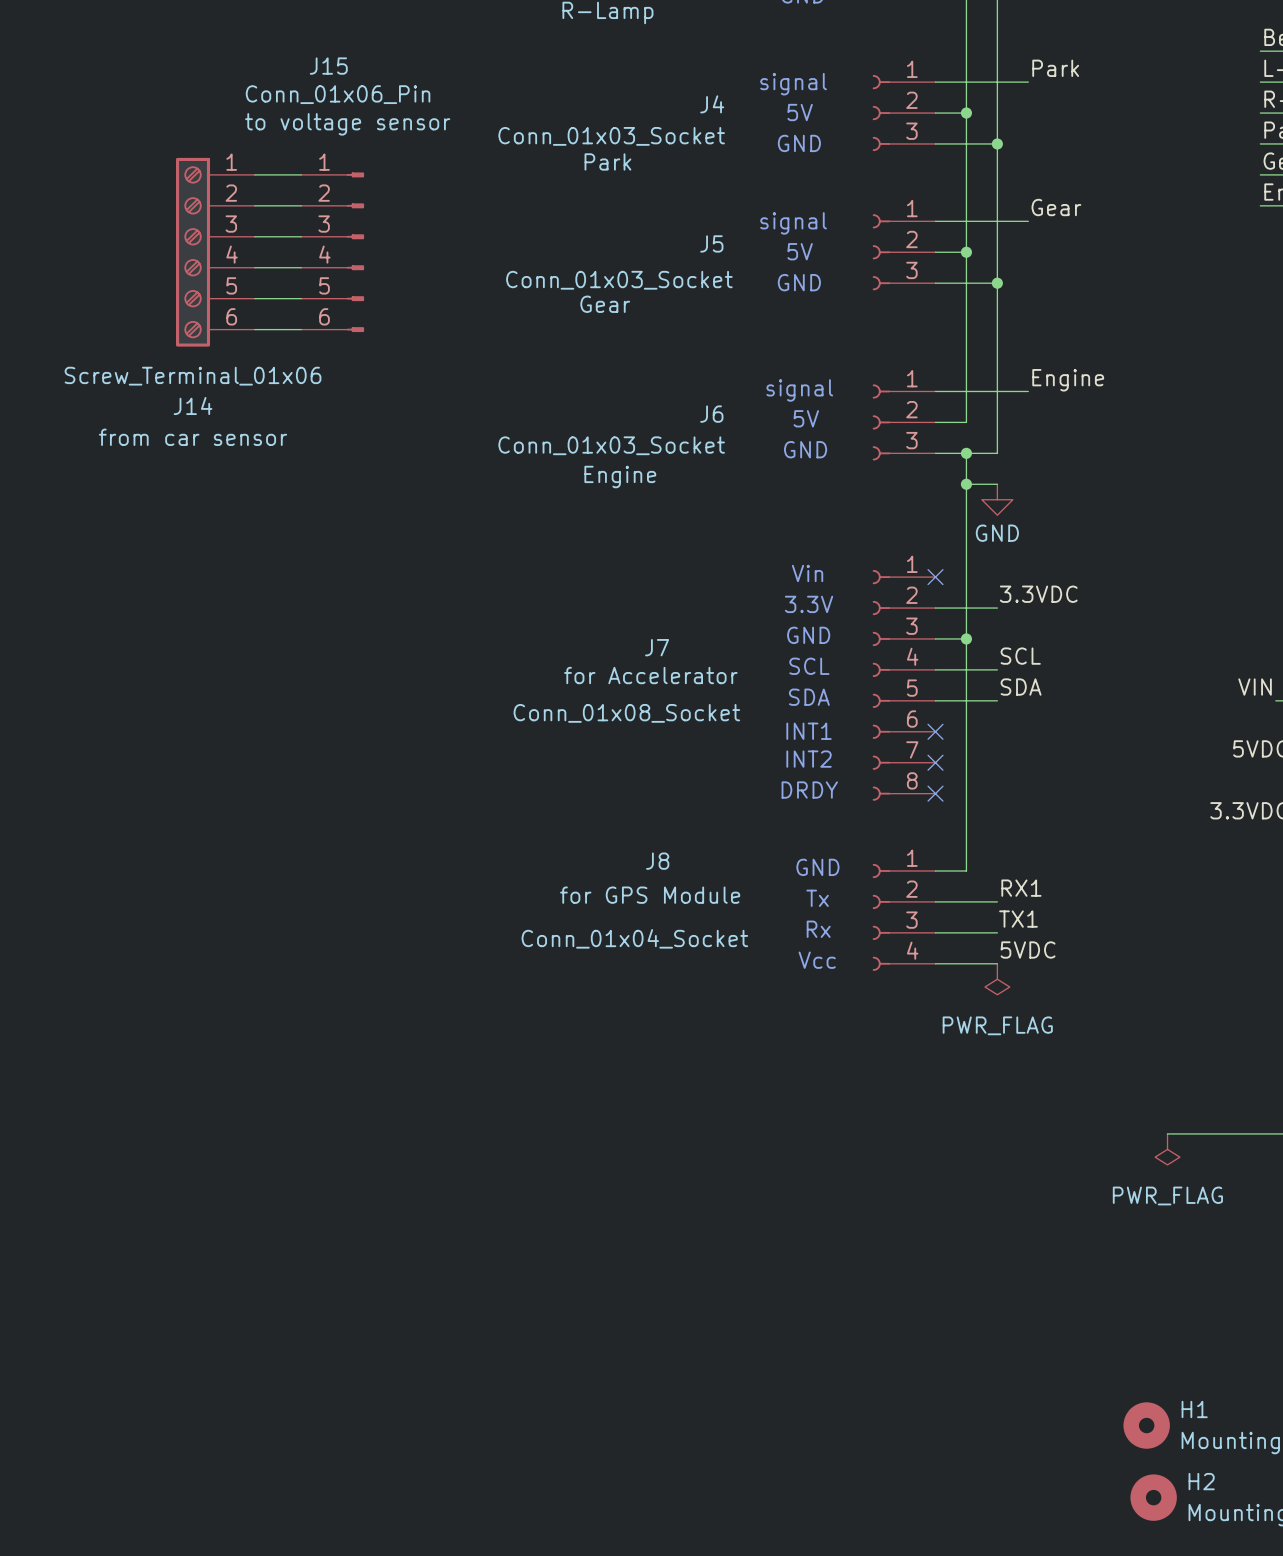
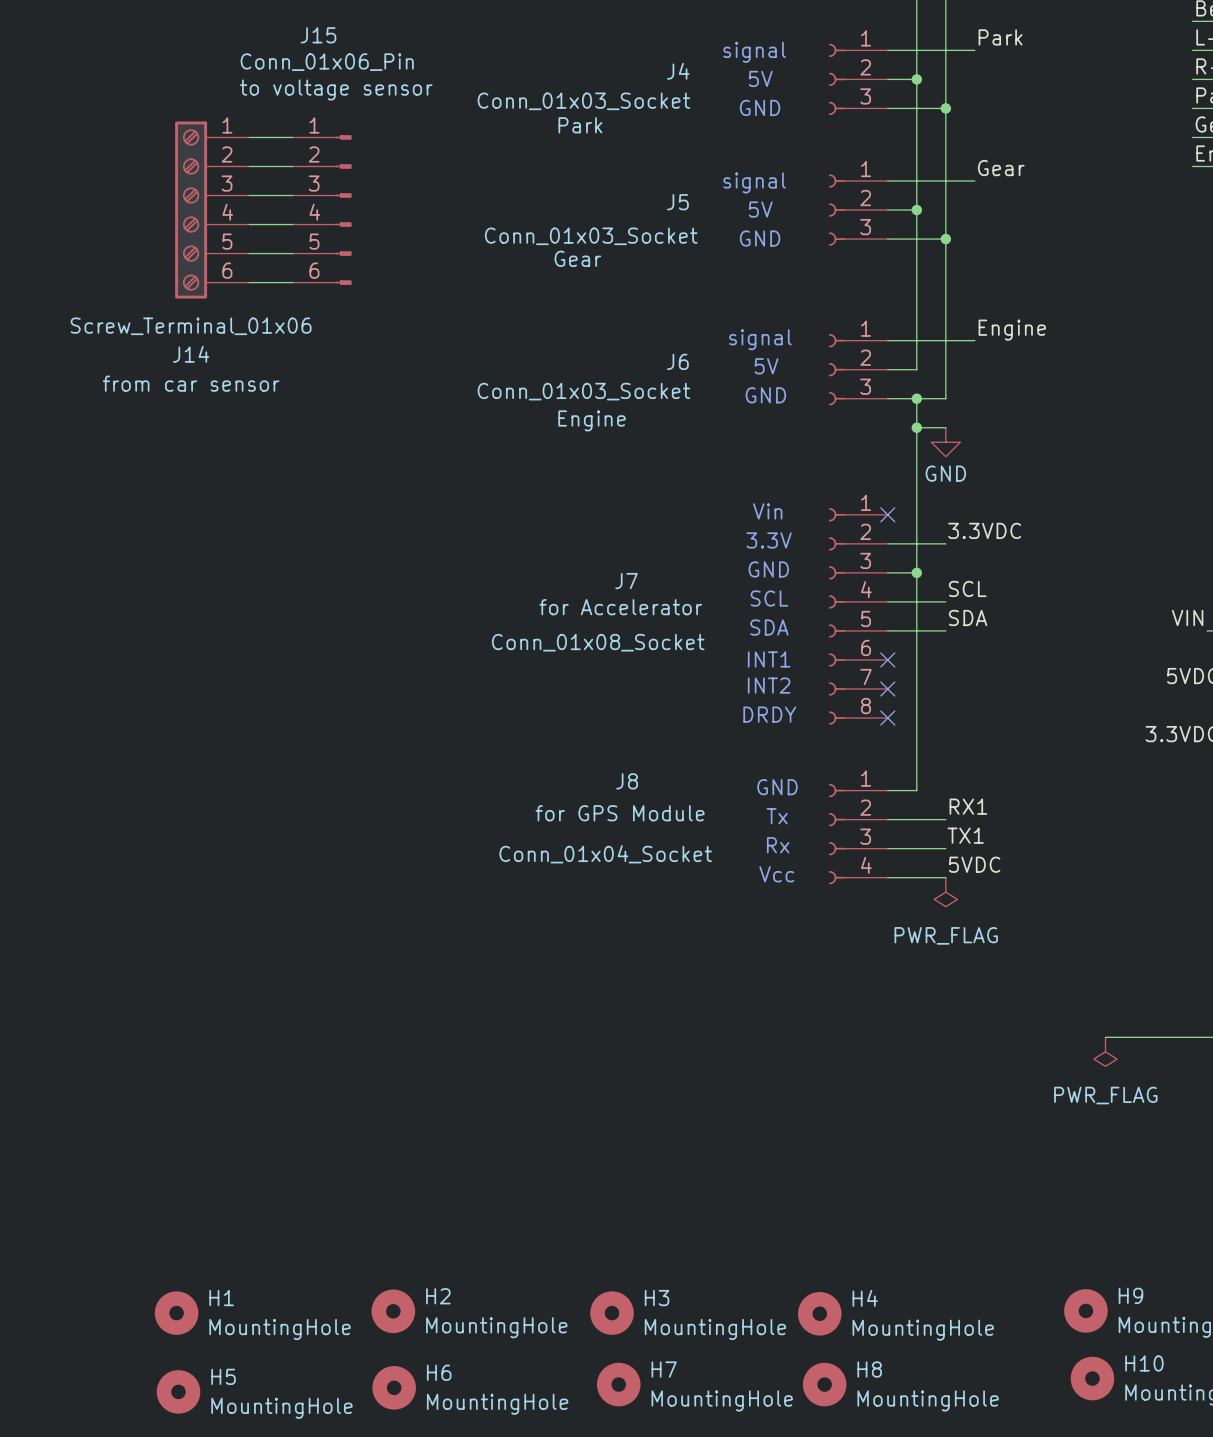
H1 name: H1 (1194, 1409) -> H9 (1130, 1295)
H2: none -> MountingHole (393, 1311)
H1: none -> MountingHole (176, 1313)
H3: none -> MountingHole (612, 1313)
H4: none -> MountingHole (819, 1313)
H2 name: H2 (1201, 1481) -> H10 (1144, 1363)
H7: none -> MountingHole (618, 1384)
H8: none -> MountingHole (824, 1384)
H6: none -> MountingHole (394, 1387)
H5: none -> MountingHole (178, 1391)

